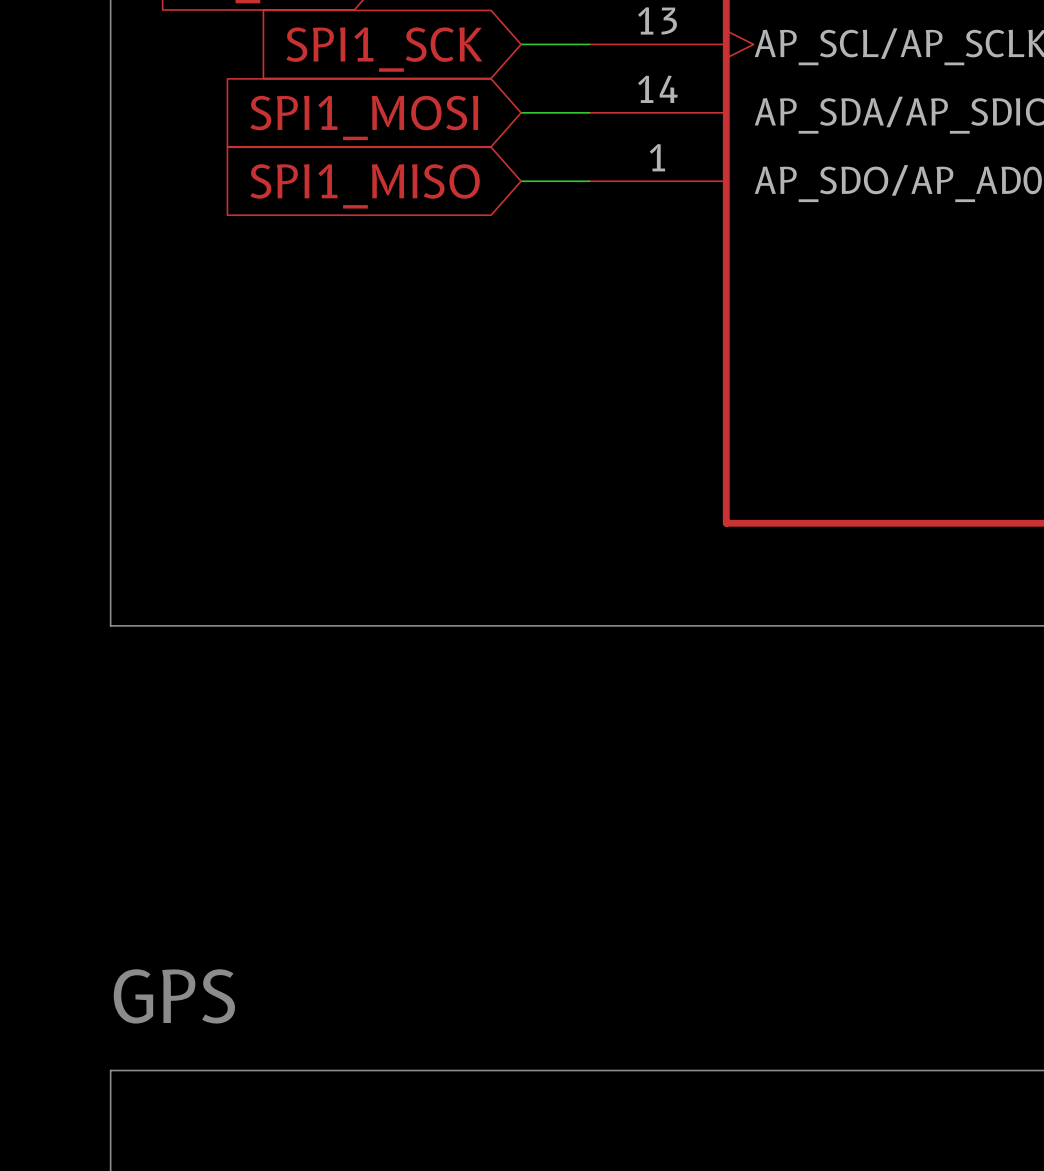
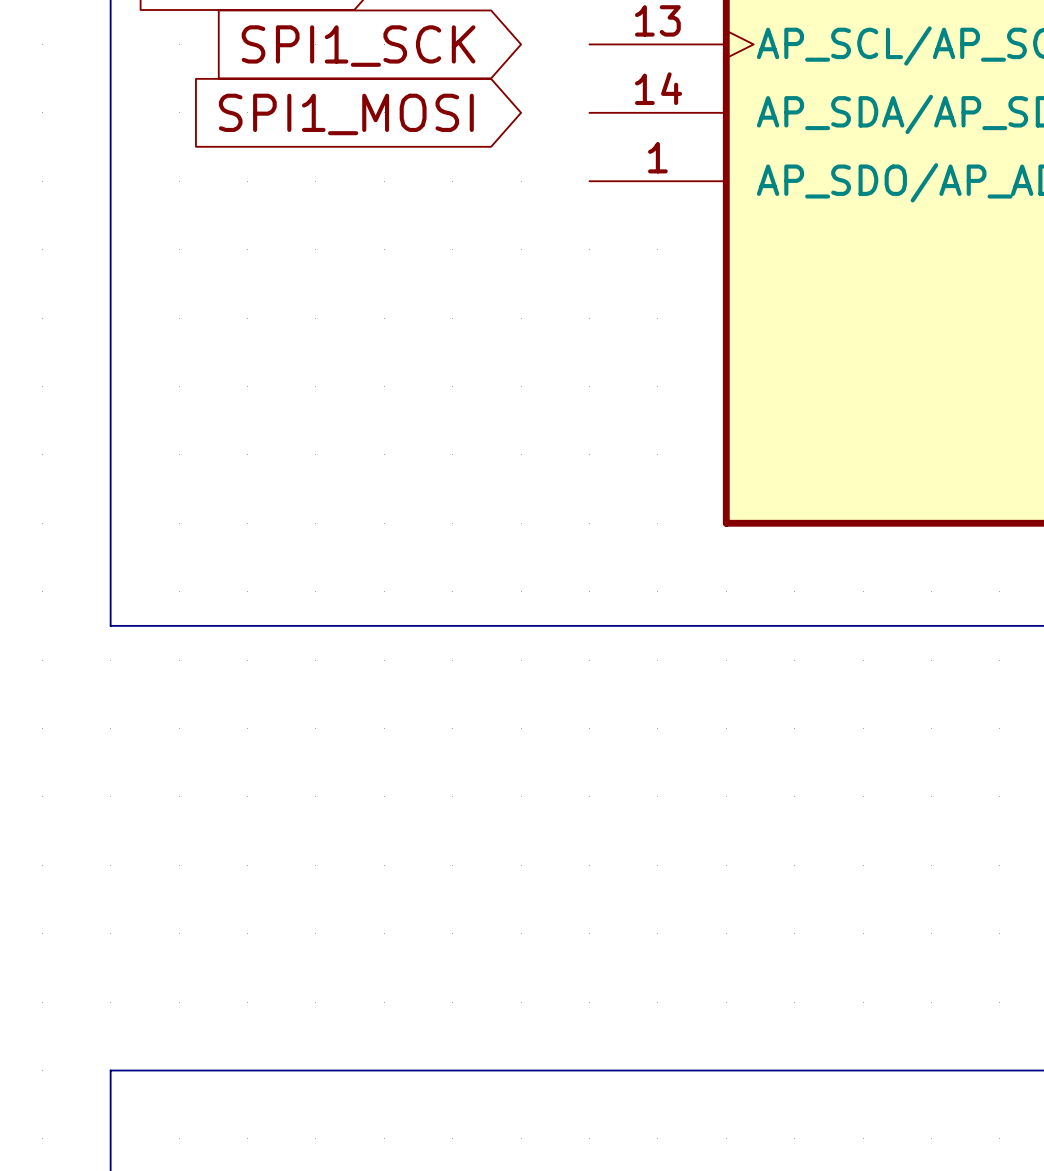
wire: (521, 44) (589, 44) -> none
wire: (521, 112) (589, 112) -> none
wire: (521, 181) (589, 181) -> none
global label: SPI1_MISO (365, 186) -> none
text: GPS (174, 996) -> none

